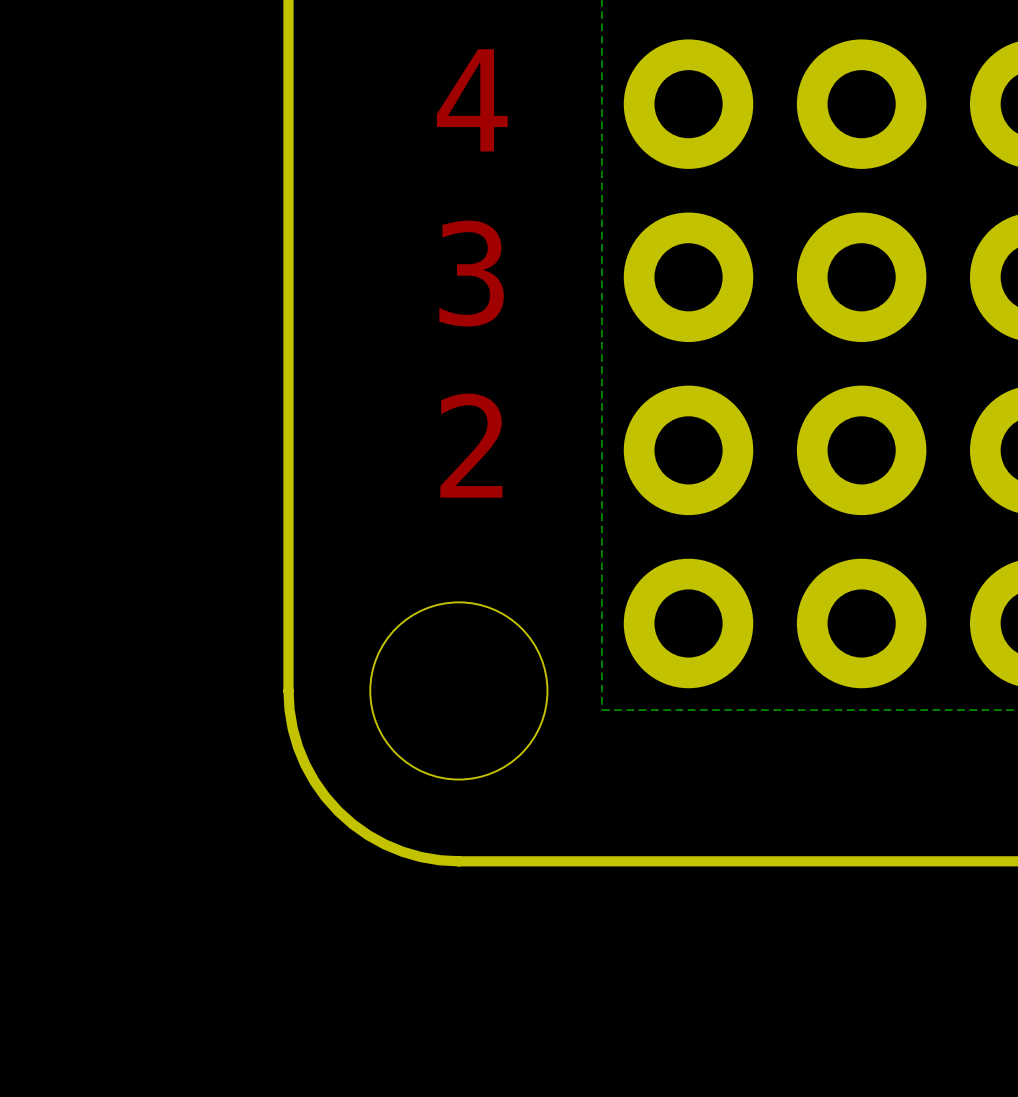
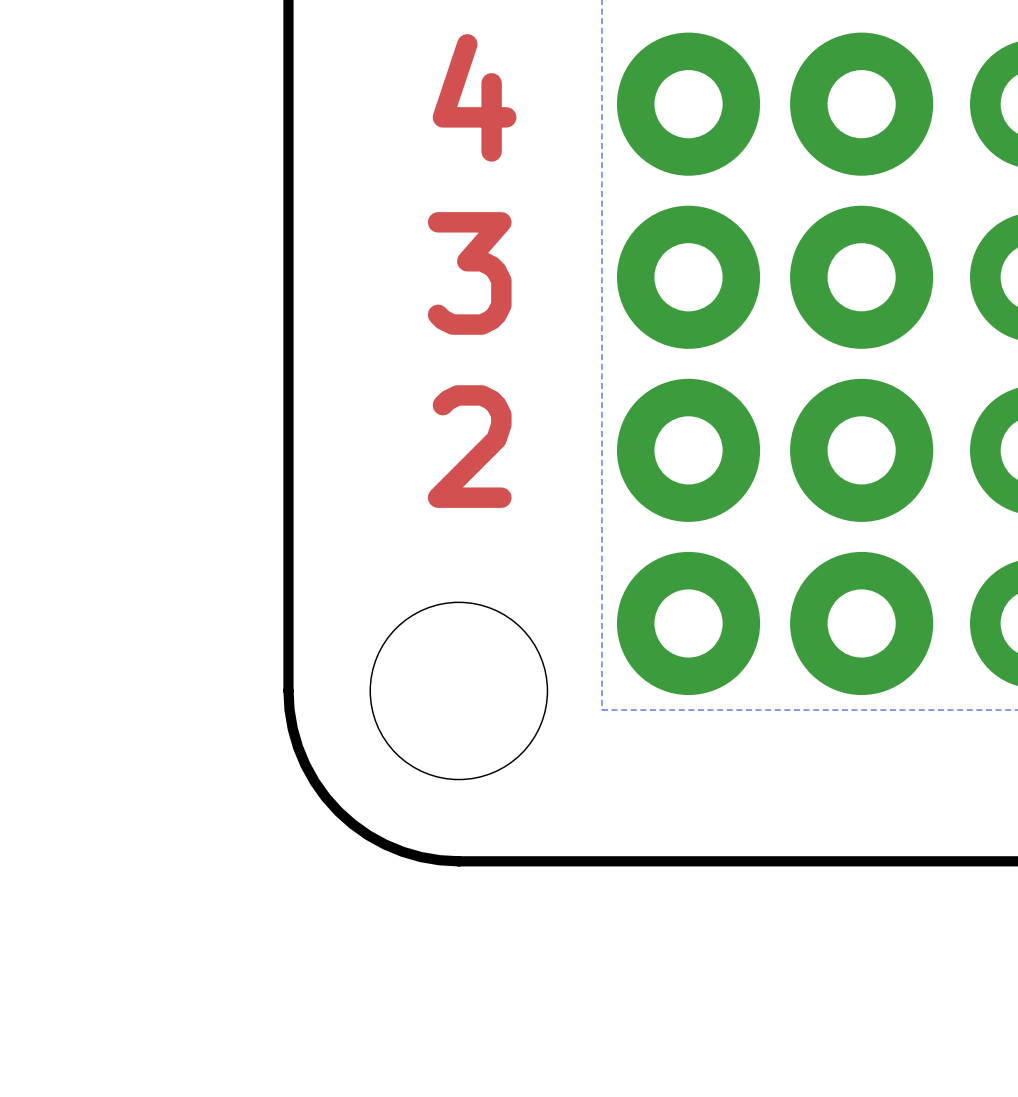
part footprint: [623, 39, 754, 169] -> [616, 32, 761, 176]
part footprint: [796, 39, 927, 169] -> [790, 32, 934, 176]
part footprint: [623, 212, 754, 343] -> [616, 205, 761, 349]
part footprint: [796, 212, 927, 343] -> [790, 205, 934, 349]
part footprint: [623, 385, 754, 516] -> [616, 378, 761, 522]
part footprint: [796, 385, 927, 516] -> [790, 378, 934, 522]
part footprint: [623, 558, 754, 689] -> [616, 551, 761, 696]
part footprint: [796, 558, 927, 689] -> [790, 551, 934, 696]

